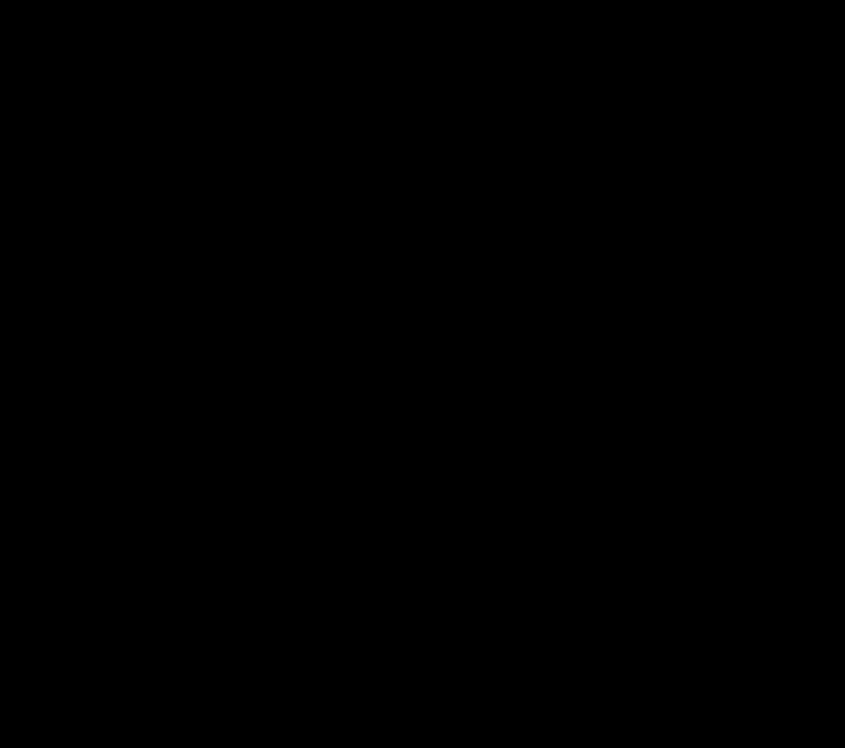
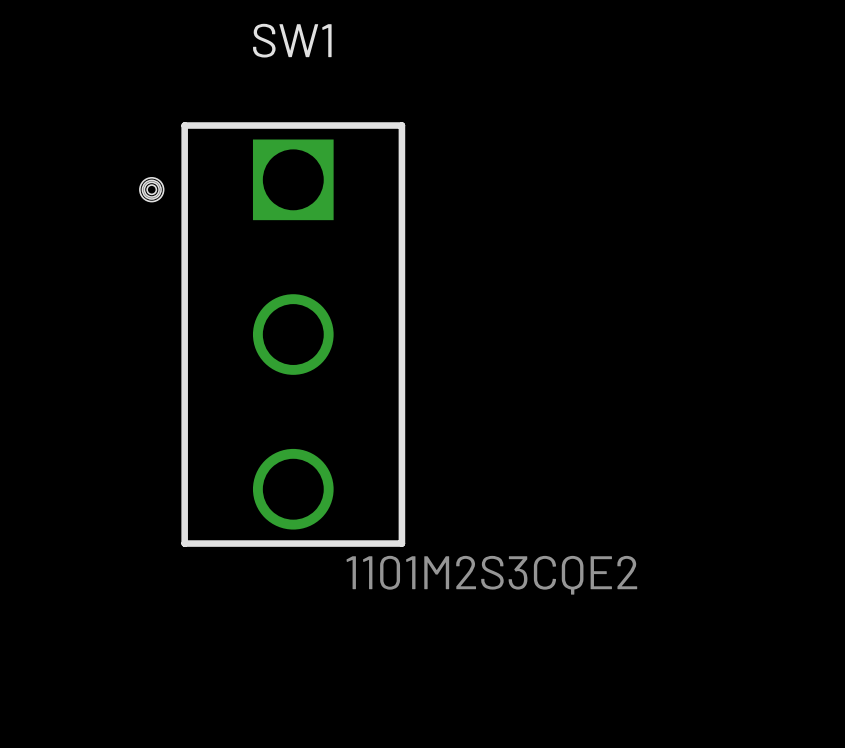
SW1: none -> 1101M2S3CQE2 (272, 334)

